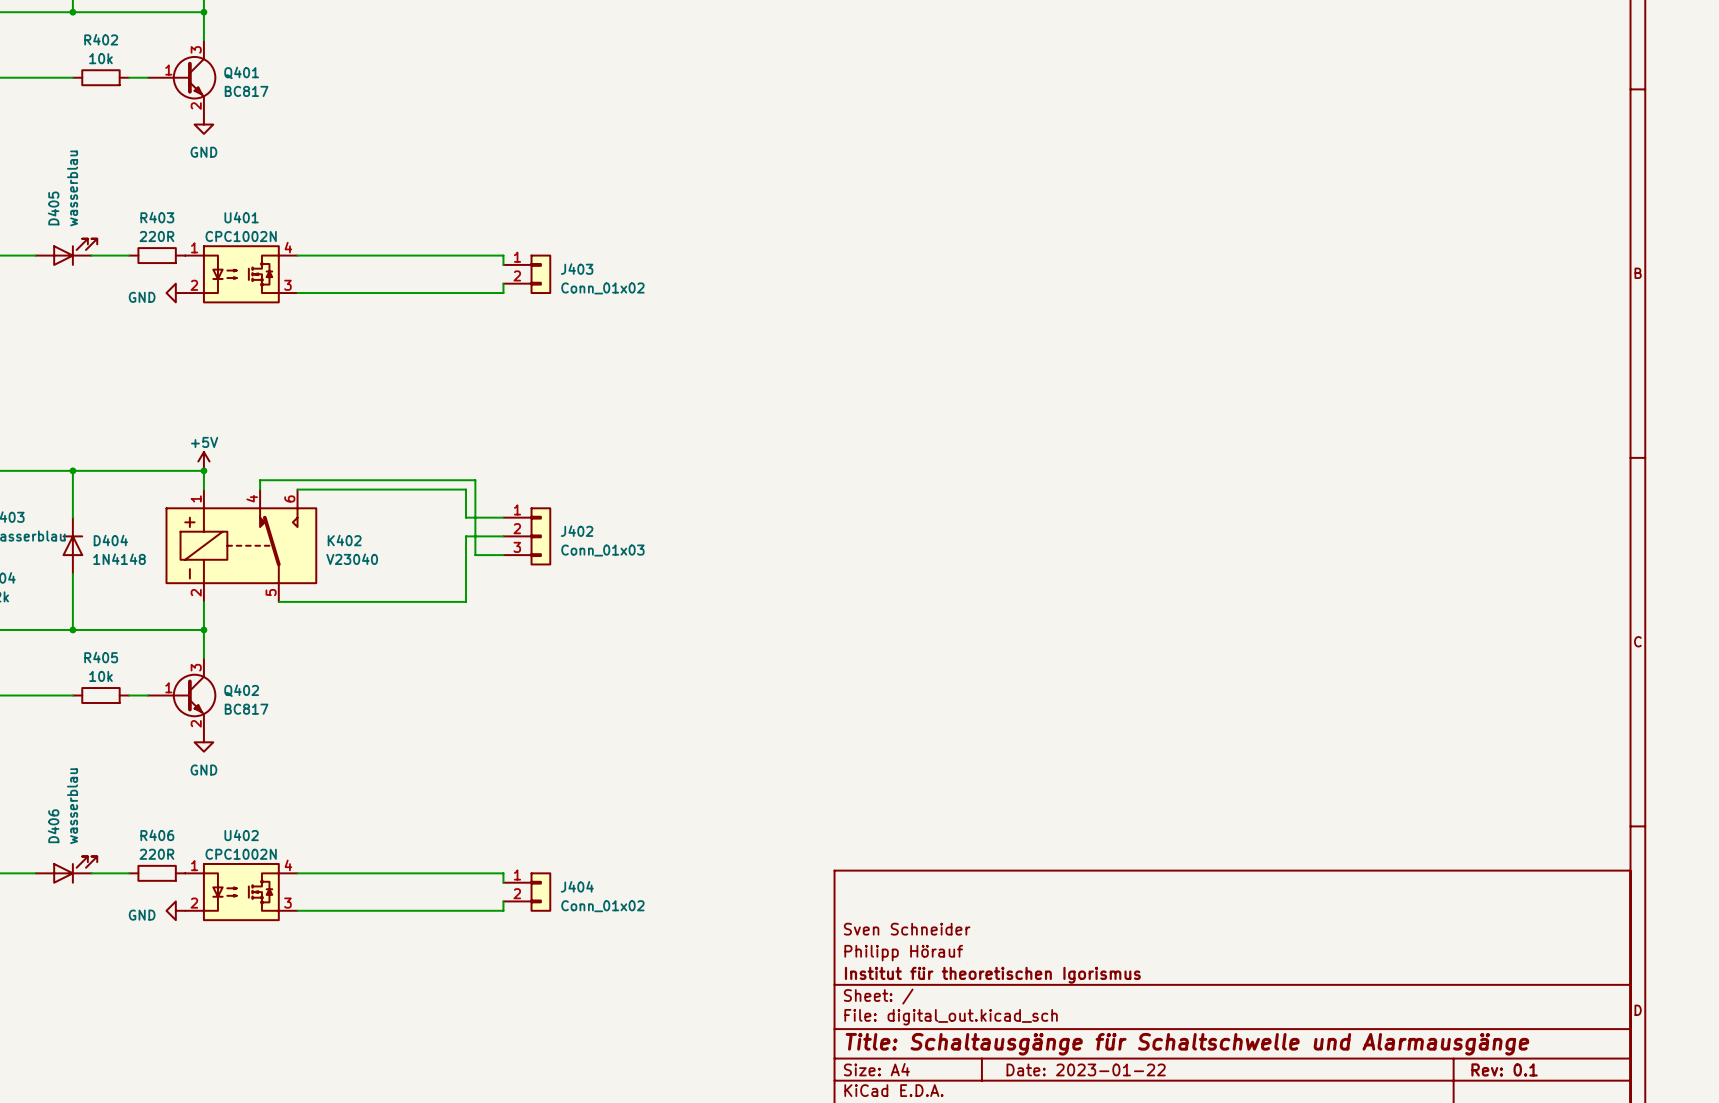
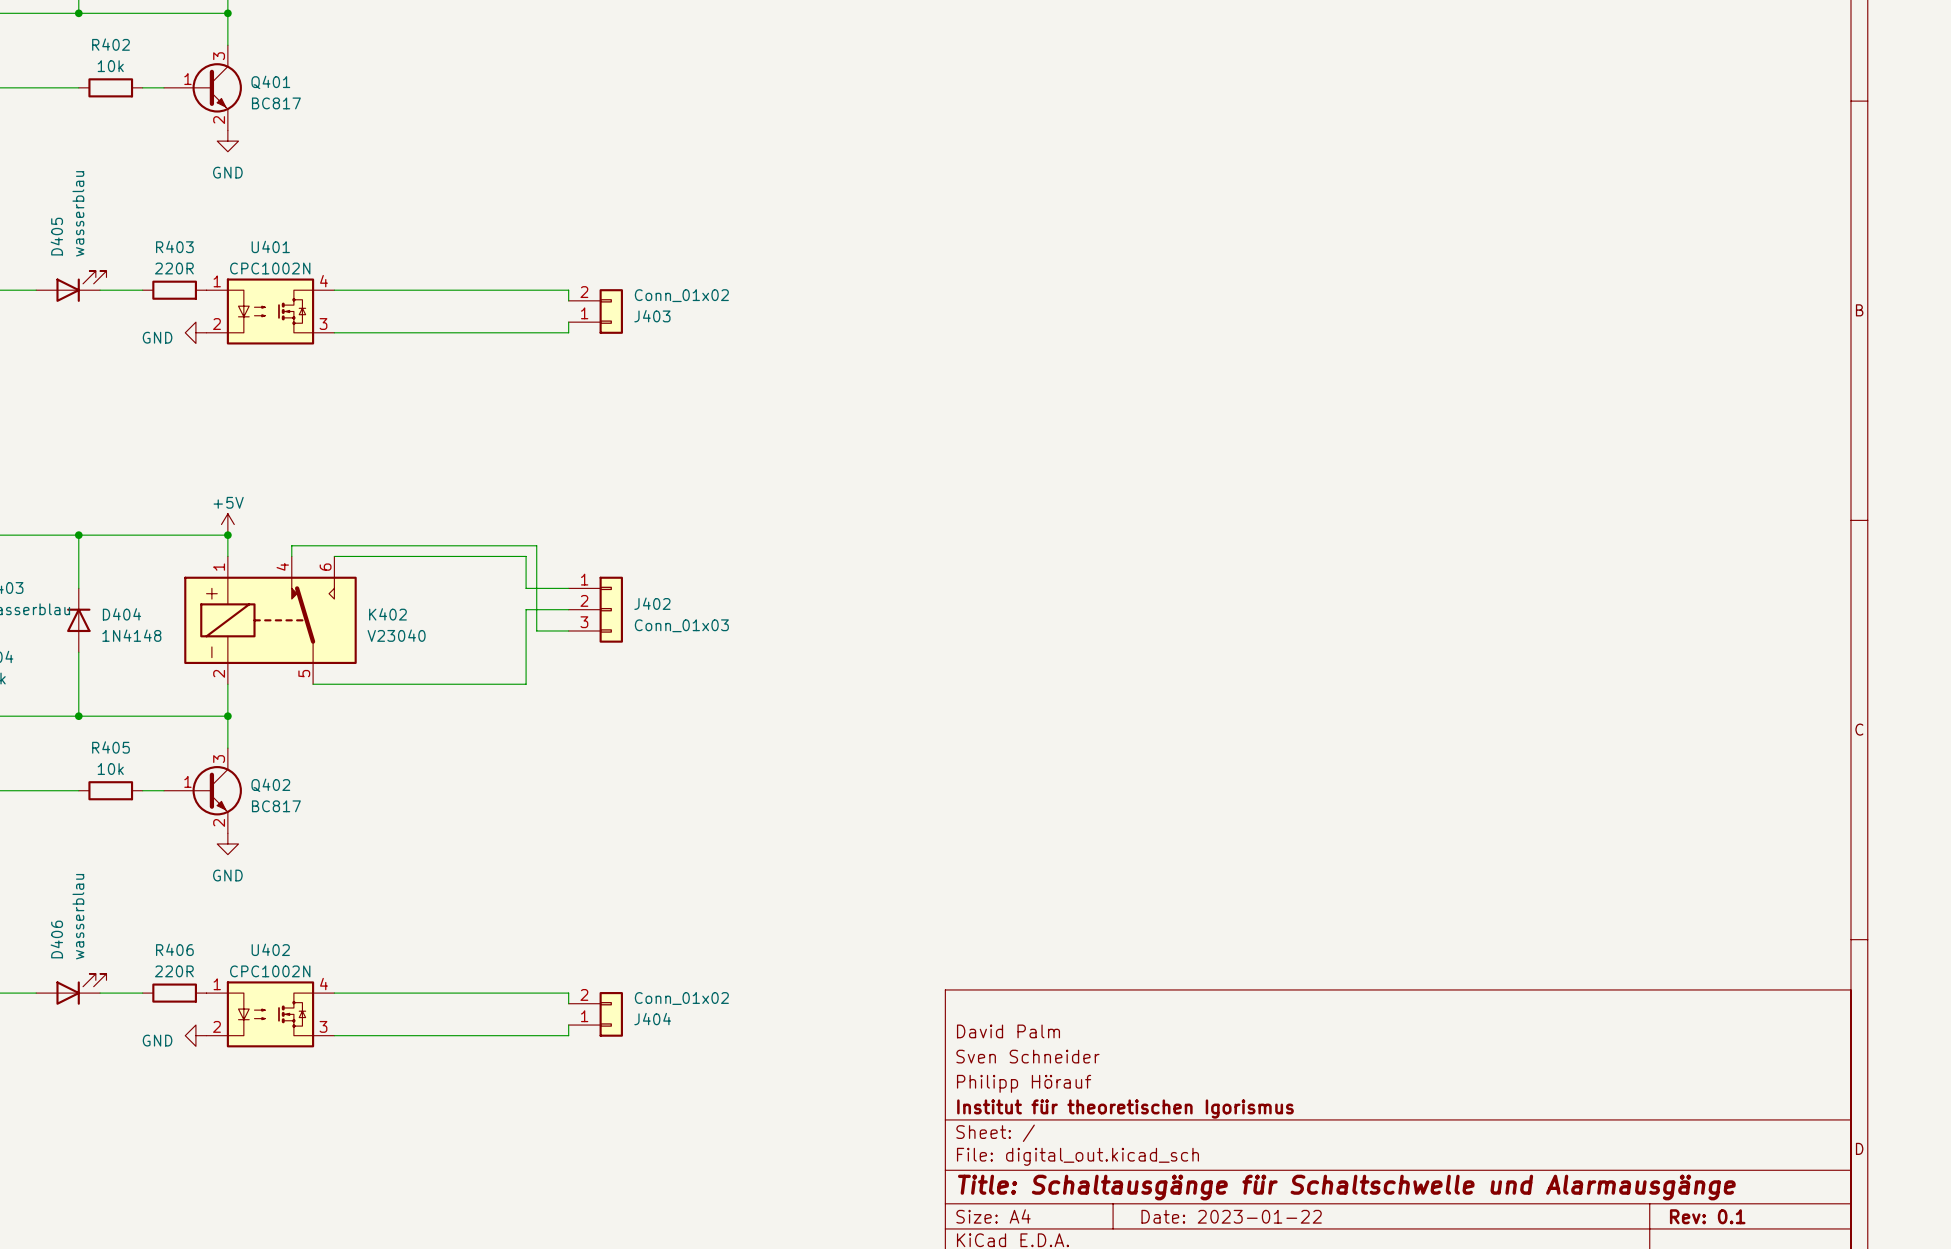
J403 flip: as is (540, 274) -> up-down (611, 311)
J404 flip: as is (540, 892) -> up-down (611, 1014)
title block: none -> David Palm (1008, 1031)

